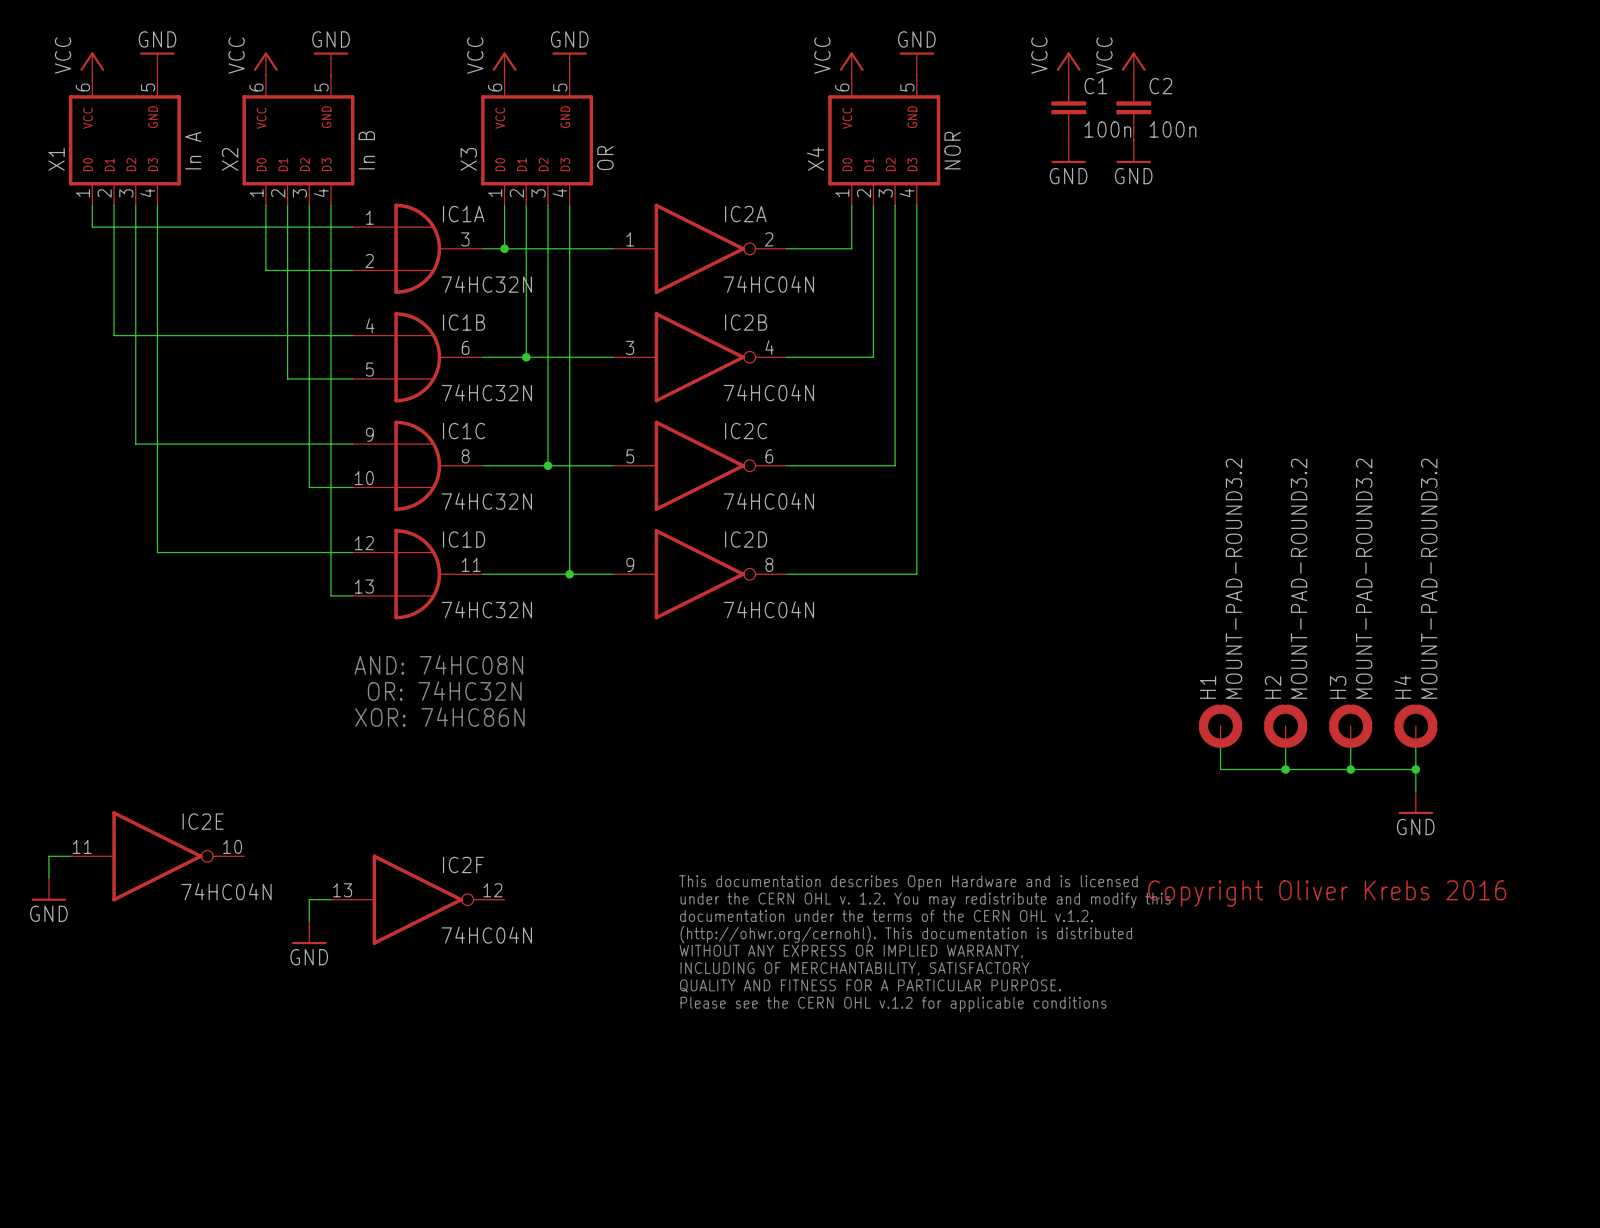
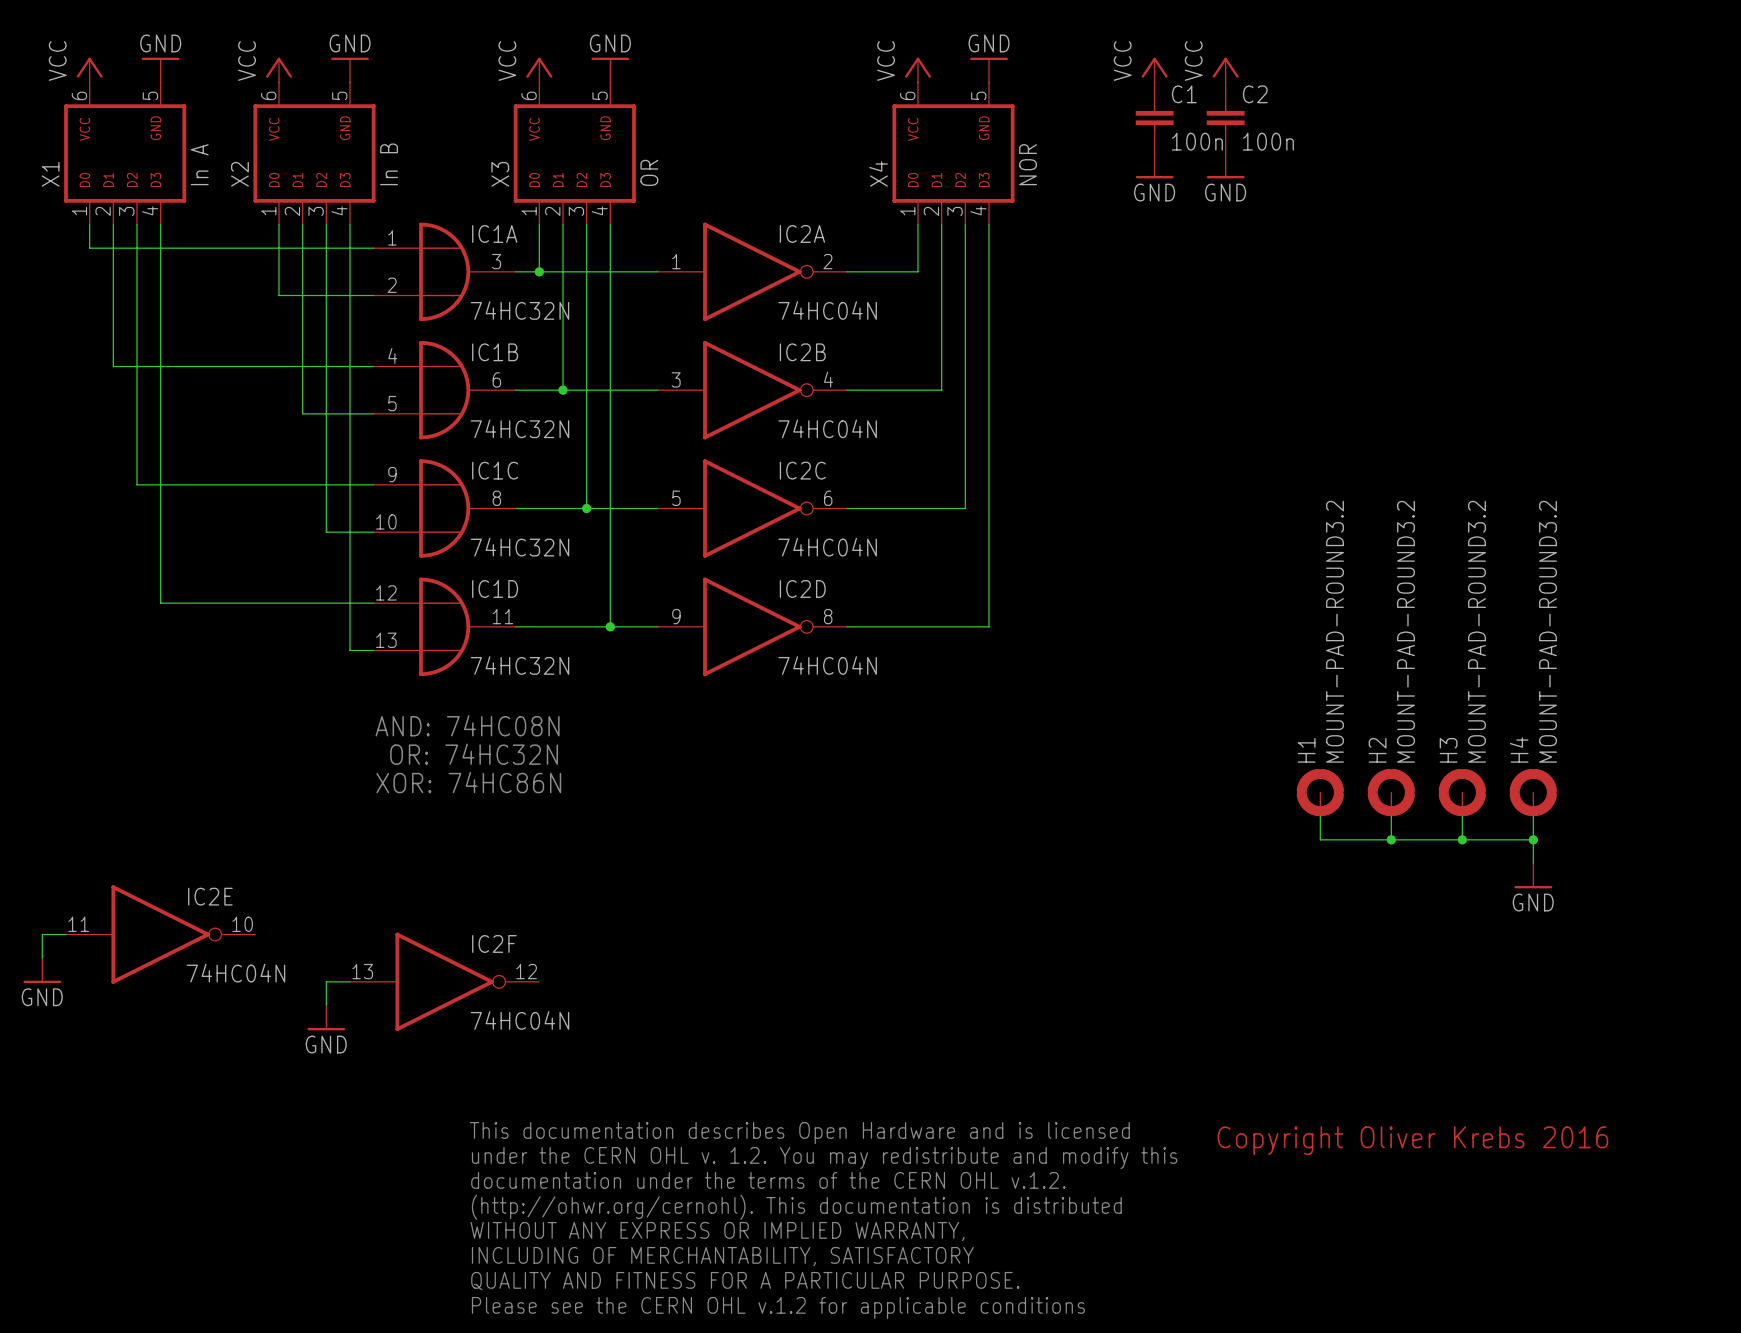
text: This documentation describes Open Hardware and is licensed (908, 883) -> none
text position: Copyright Oliver Krebs 2016 (1327, 893) -> Copyright Oliver Krebs 2016 (1412, 1140)
text: under the CERN OHL v. 1.2. You may redistribute and modify this (925, 900) -> none
text: documentation under the terms of the CERN OHL v.1.2. (886, 915) -> none
text: (http://ohwr.org/cernohl). This documentation is distributed (906, 934) -> none
text: WITHOUT ANY EXPRESS OR IMPLIED WARRANTY, (851, 951) -> none
text: INCLUDING OF MERCHANTABILITY, SATISFACTORY (854, 968) -> none
text: QUALITY AND FITNESS FOR A PARTICULAR PURPOSE. (870, 985) -> none
text: Please see the CERN OHL v.1.2 for applicable conditions (893, 1004) -> none
text: none -> This documentation describes Open Hardware and is licensed (799, 1133)
text: none -> under the CERN OHL v. 1.2. You may redistribute and modify this (824, 1158)
text: none -> documentation under the terms of the CERN OHL v.1.2. (768, 1180)
text: none -> (http://ohwr.org/cernohl). This documentation is distributed (796, 1207)
text: none -> WITHOUT ANY EXPRESS OR IMPLIED WARRANTY, (717, 1231)
text: none -> INCLUDING OF MERCHANTABILITY, SATISFACTORY (722, 1256)
text: none -> QUALITY AND FITNESS FOR A PARTICULAR PURPOSE. (745, 1281)
text: none -> Please see the CERN OHL v.1.2 for applicable conditions (778, 1307)

